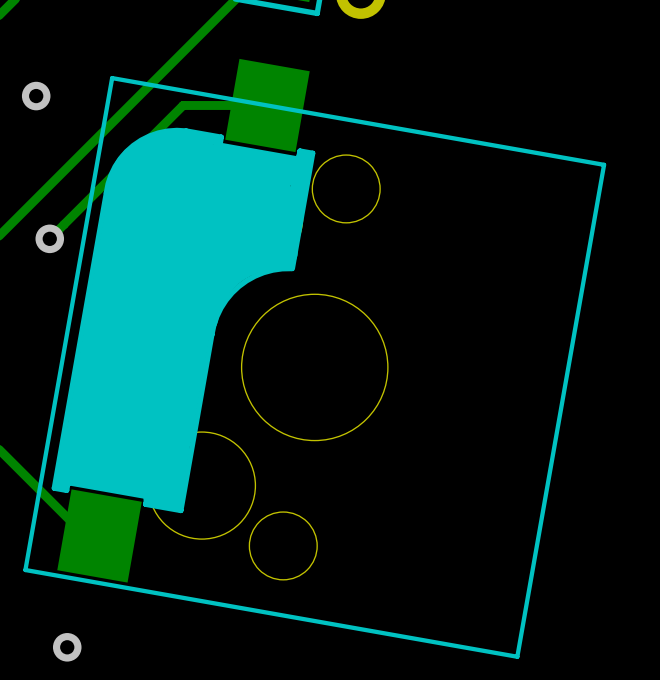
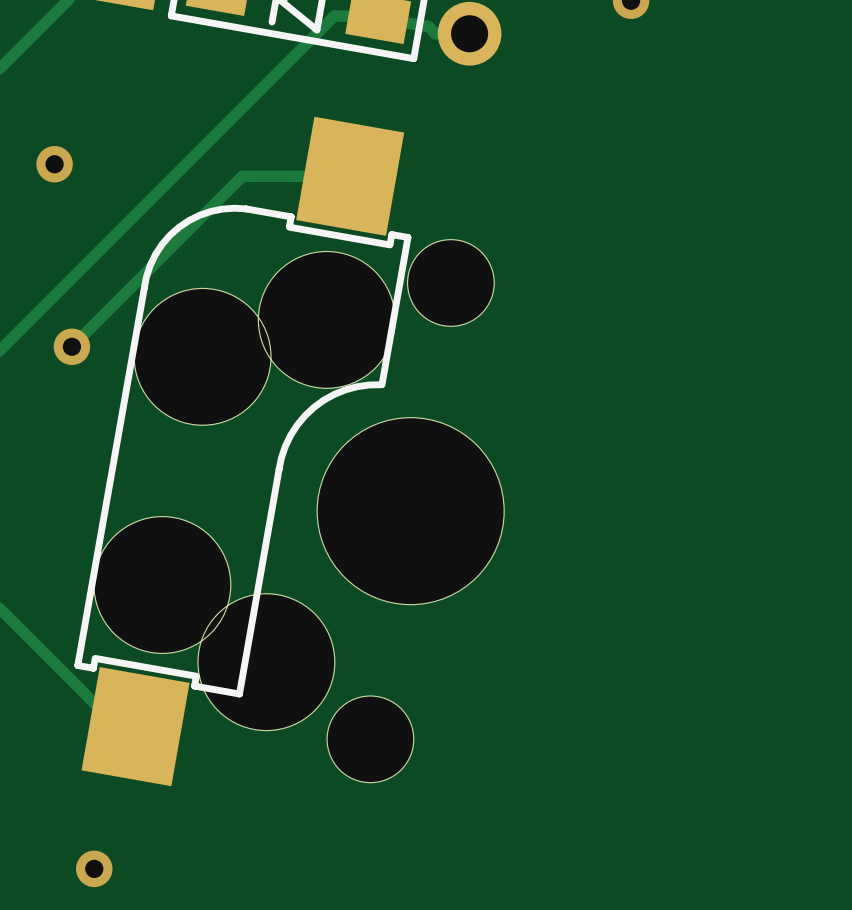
part: none -> (289, 451)
part: (314, 358) -> none

